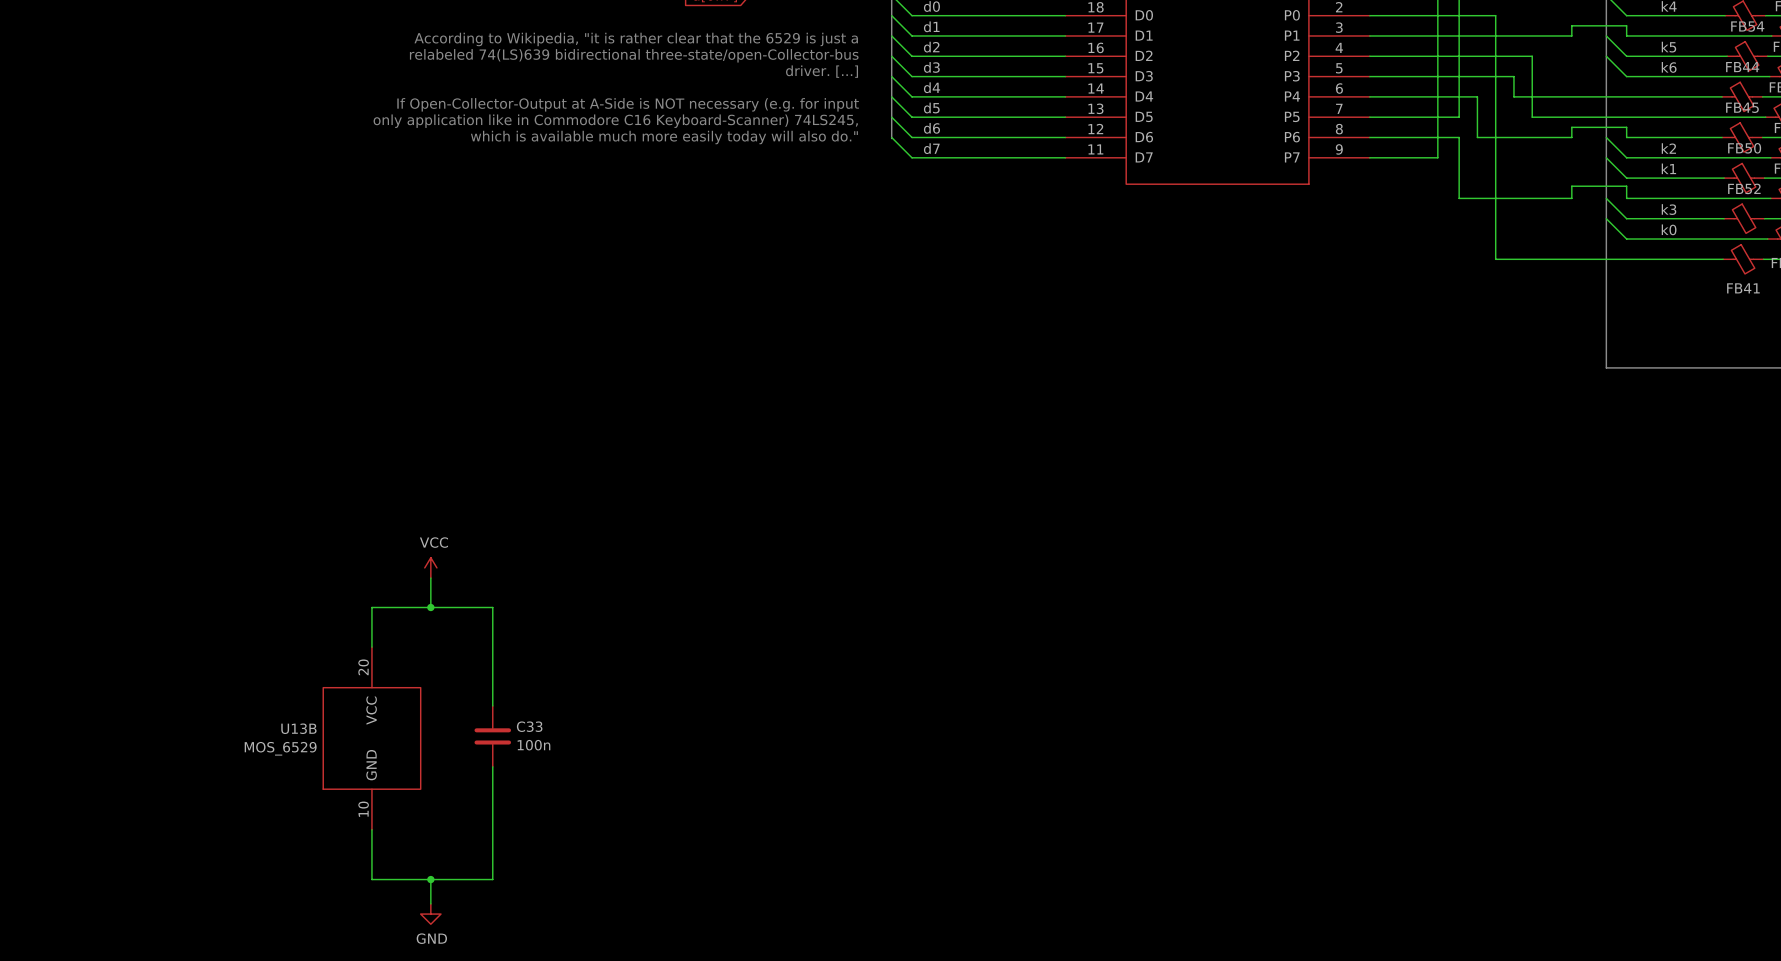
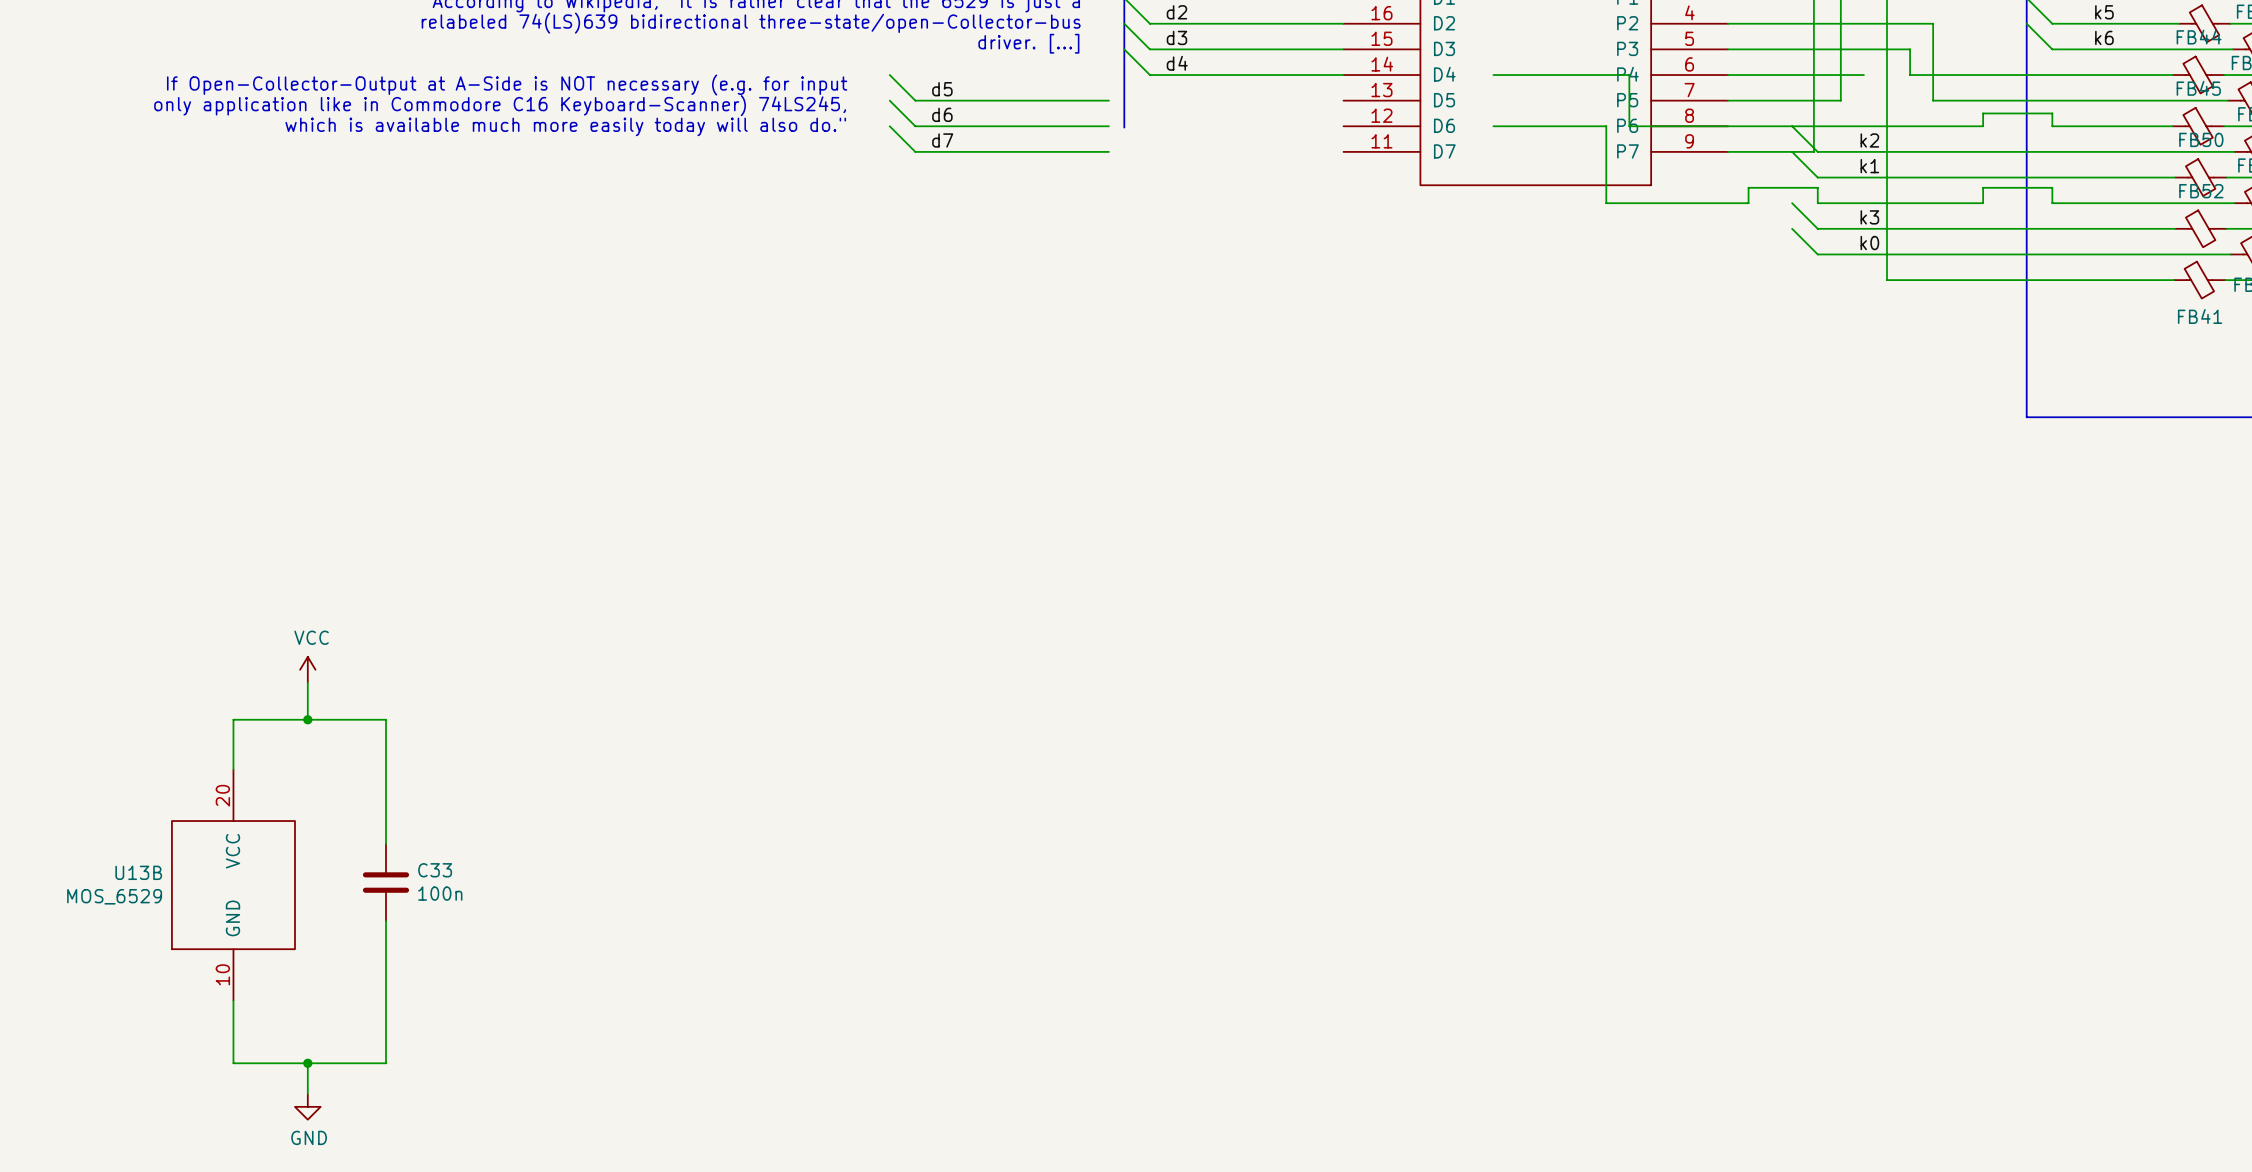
wire: (891, 96) (912, 117) (1065, 117) -> (889, 75) (915, 100) (1108, 100)
wire: none -> (1493, 75) (1629, 75) (1629, 126) (1728, 126)
wire: (1477, 96) (1477, 137) -> (1840, 126) (1863, 126)
text position: If Open-Collector-Output at A-Side is NOT necessary (e.g. for input (628, 104) -> If Open-Collector-Output at A-Side is NOT necessary (e.g. for input (507, 85)
label position: d5 (931, 108) -> d5 (942, 89)
wire: (891, 117) (912, 137) (1065, 137) -> (889, 100) (915, 126) (1108, 126)
text position: only application like in Commodore C16 Keyboard-Scanner) 74LS245, (615, 121) -> only application like in Commodore C16 Keyboard-Scanner) 74LS245, (500, 105)
label position: d6 (931, 128) -> d6 (942, 114)
text position: which is available much more easily today will also do." (664, 137) -> which is available much more easily today will also do." (565, 126)
wire: (891, 137) (912, 157) (1065, 157) -> (889, 126) (915, 151) (1108, 151)
wire: (1459, 137) (1459, 198) -> (1493, 126) (1606, 126) (1606, 203) (1748, 203) (1748, 187) (1817, 187) (1817, 203) (1840, 203)
wire: (1606, 137) (1626, 157) -> (1792, 126) (1817, 151) (2052, 151)
label position: d7 (931, 148) -> d7 (942, 140)
label position: k2 (1668, 148) -> k2 (1869, 140)
wire: (1606, 157) (1626, 178) -> (1792, 151) (1817, 177) (2052, 177)
label position: k1 (1668, 168) -> k1 (1869, 166)
wire: (1606, 198) (1626, 218) -> (1792, 203) (1817, 228) (2052, 228)
label position: k3 (1669, 209) -> k3 (1869, 217)
wire: (1606, 218) (1626, 239) -> (1792, 228) (1817, 254) (2052, 254)
label position: k0 (1669, 229) -> k0 (1869, 243)
power symbol position: VCC (430, 567) -> VCC (307, 669)
wire: (430, 578) (430, 607) -> (307, 682) (307, 719)
junction: none -> (307, 719)
junction: (430, 607) -> none
wire: (371, 647) (371, 607) (492, 607) (492, 705) -> (233, 769) (233, 719) (386, 719) (386, 844)
C33 position: (492, 736) -> (386, 882)
U13B position: (371, 738) -> (233, 885)
wire: (492, 766) (492, 879) (371, 879) (371, 829) -> (386, 921) (386, 1063) (233, 1063) (233, 1000)
junction: none -> (307, 1063)
wire: (430, 879) (430, 903) -> (307, 1063) (307, 1094)
junction: (430, 879) -> none
power symbol position: GND (430, 914) -> GND (307, 1106)

